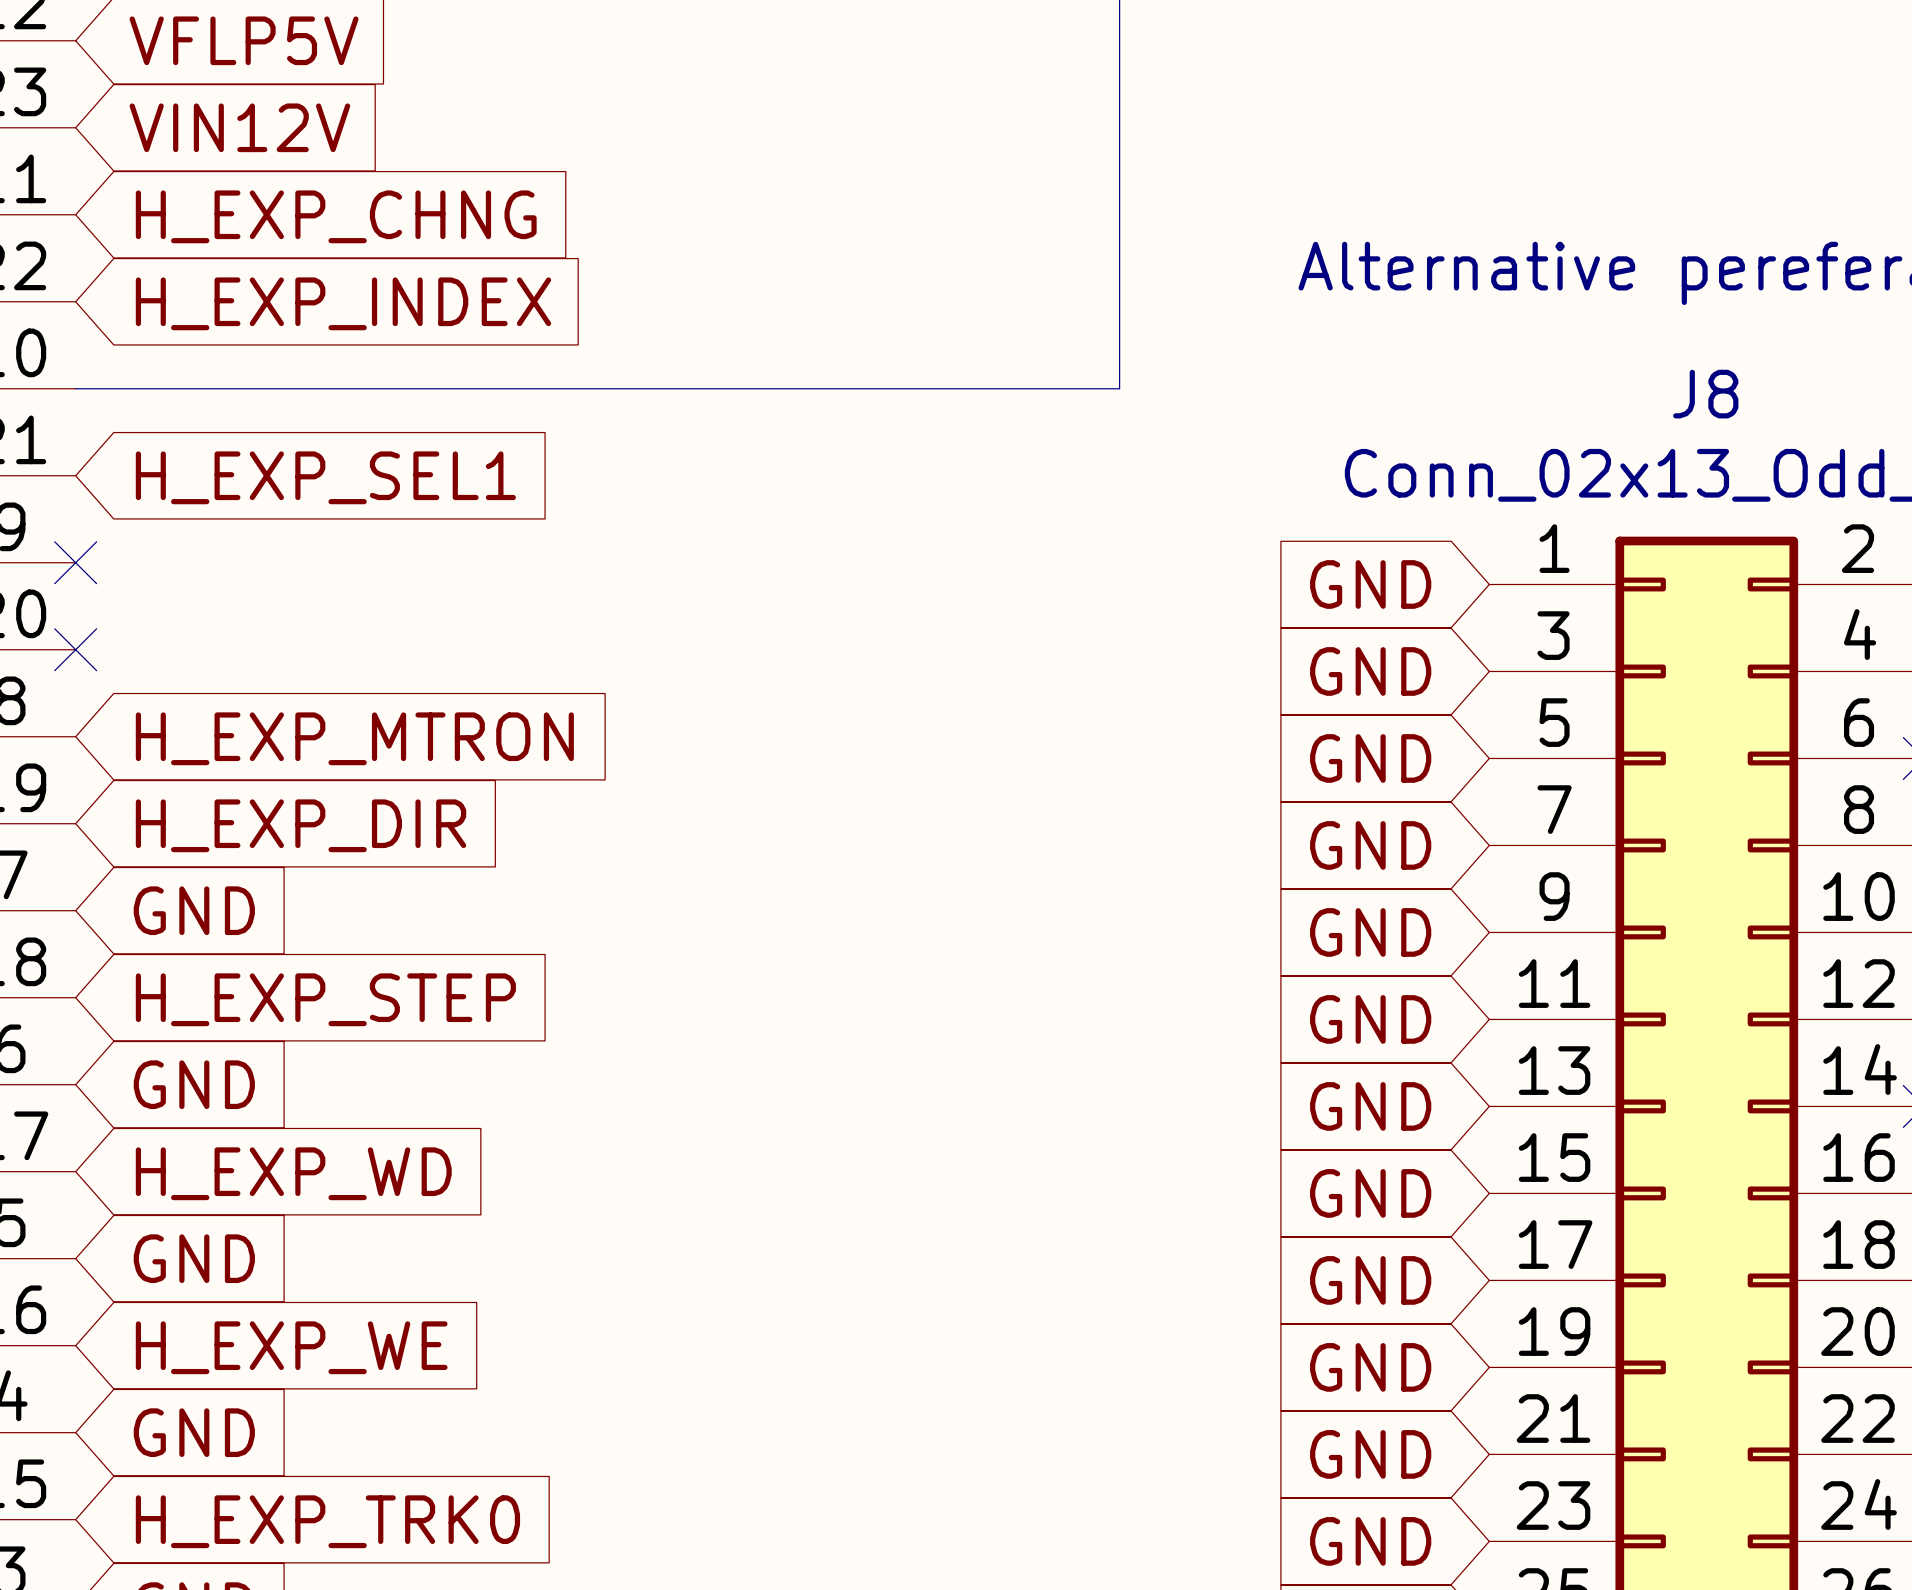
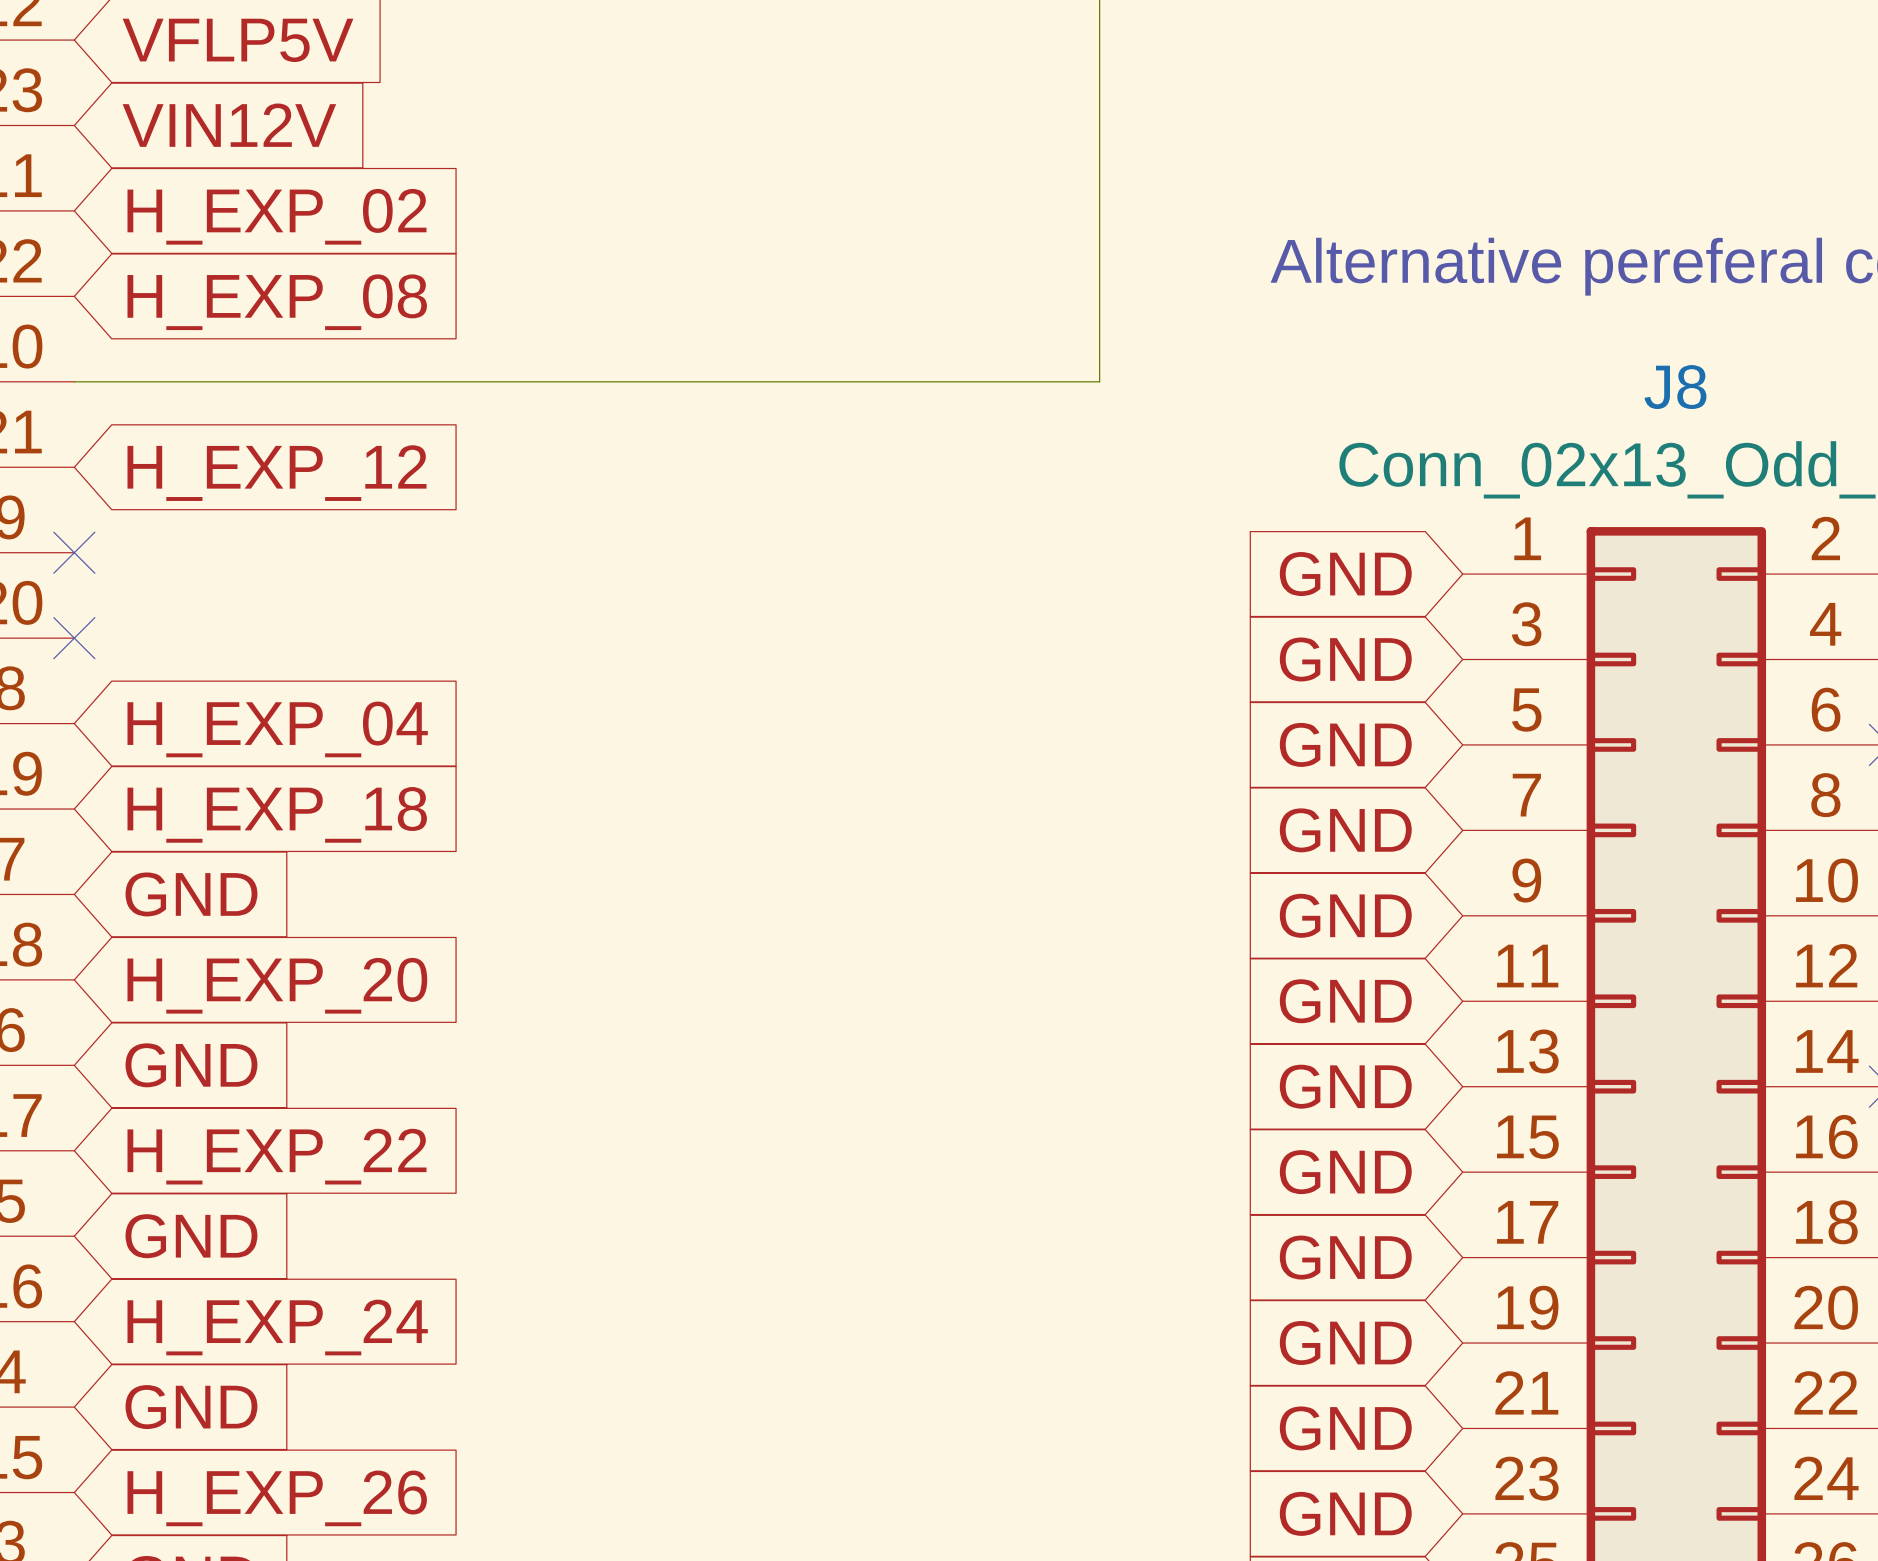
global label: H_EXP_CHNG (336, 216) -> H_EXP_02 (277, 216)
global label: H_EXP_INDEX (343, 303) -> H_EXP_08 (277, 302)
global label: H_EXP_SEL1 (325, 477) -> H_EXP_12 (277, 473)
global label: H_EXP_MTRON (354, 738) -> H_EXP_04 (277, 729)
global label: H_EXP_DIR (301, 825) -> H_EXP_18 (277, 814)
global label: H_EXP_STEP (325, 999) -> H_EXP_20 (277, 985)
global label: H_EXP_WD (293, 1173) -> H_EXP_22 (277, 1156)
global label: H_EXP_WE (291, 1347) -> H_EXP_24 (277, 1327)
global label: H_EXP_TRK0 (327, 1521) -> H_EXP_26 (277, 1498)

